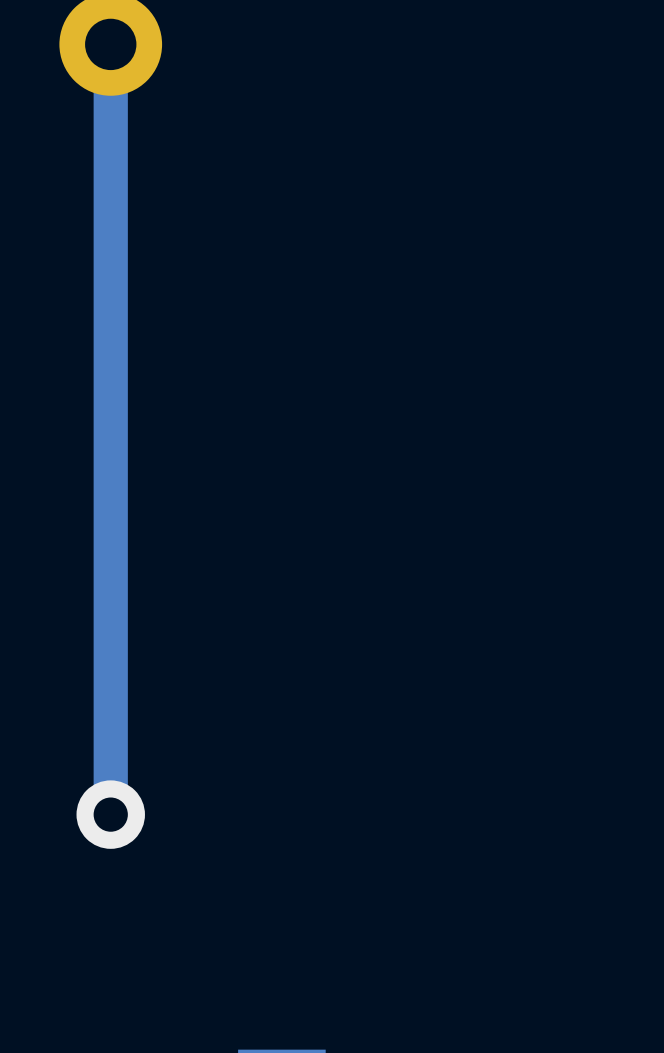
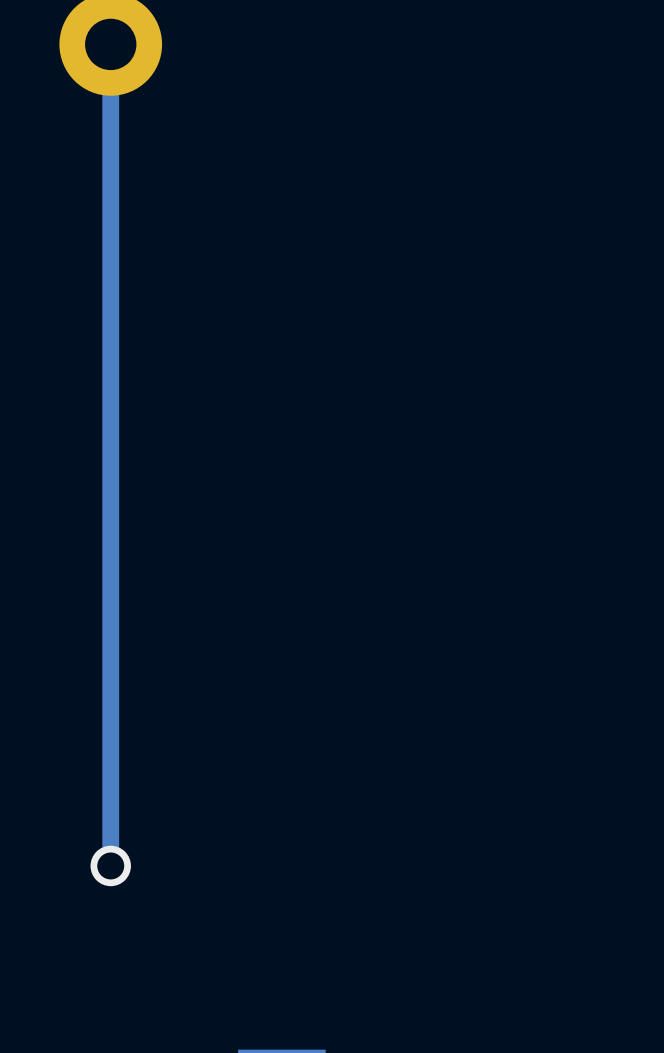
track width: thick (110, 44) (110, 814) -> thin (110, 44) (110, 814)
via size: [76, 780, 145, 849] -> [90, 845, 131, 887]
track: none -> (110, 814) (110, 865)

